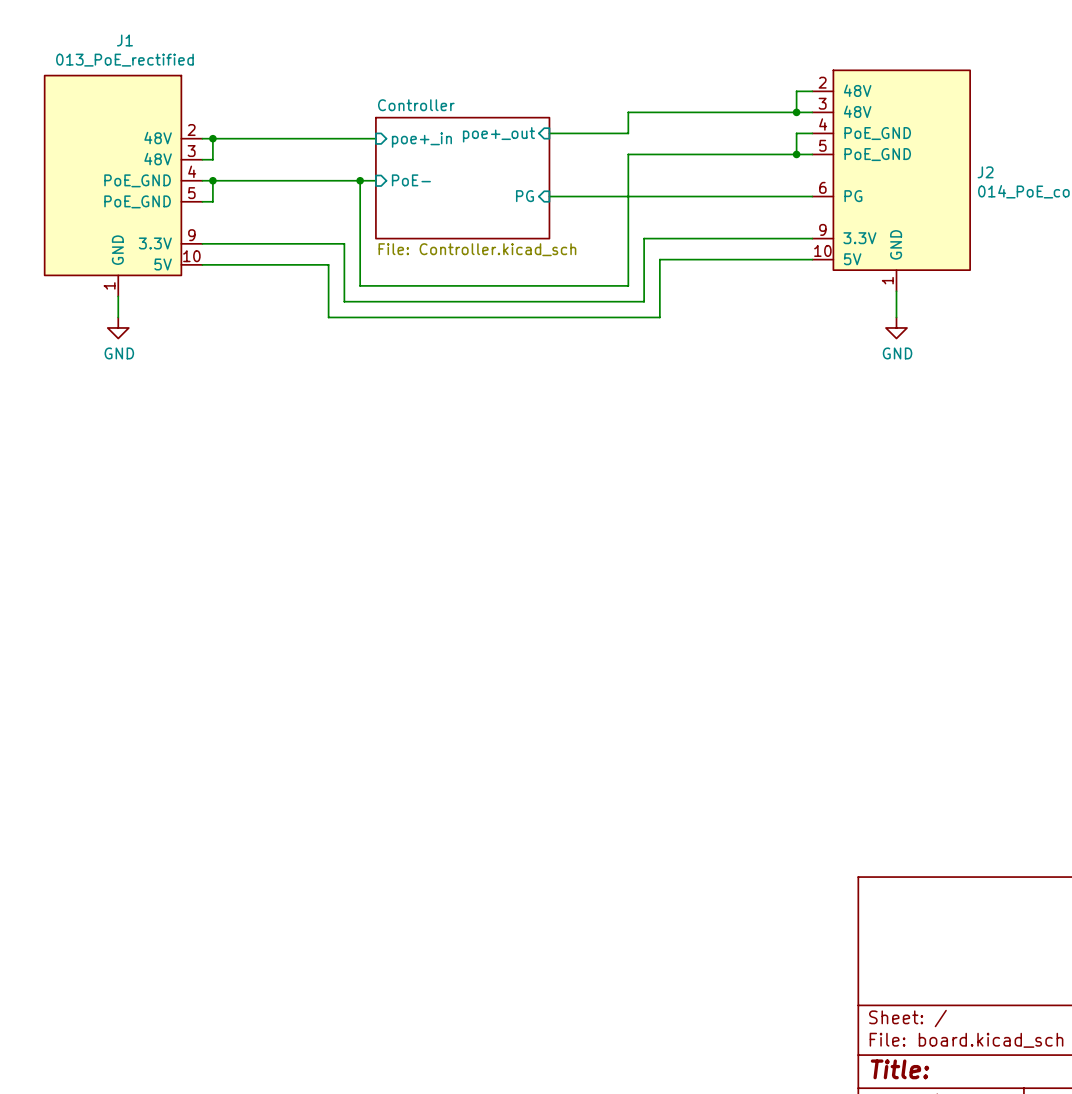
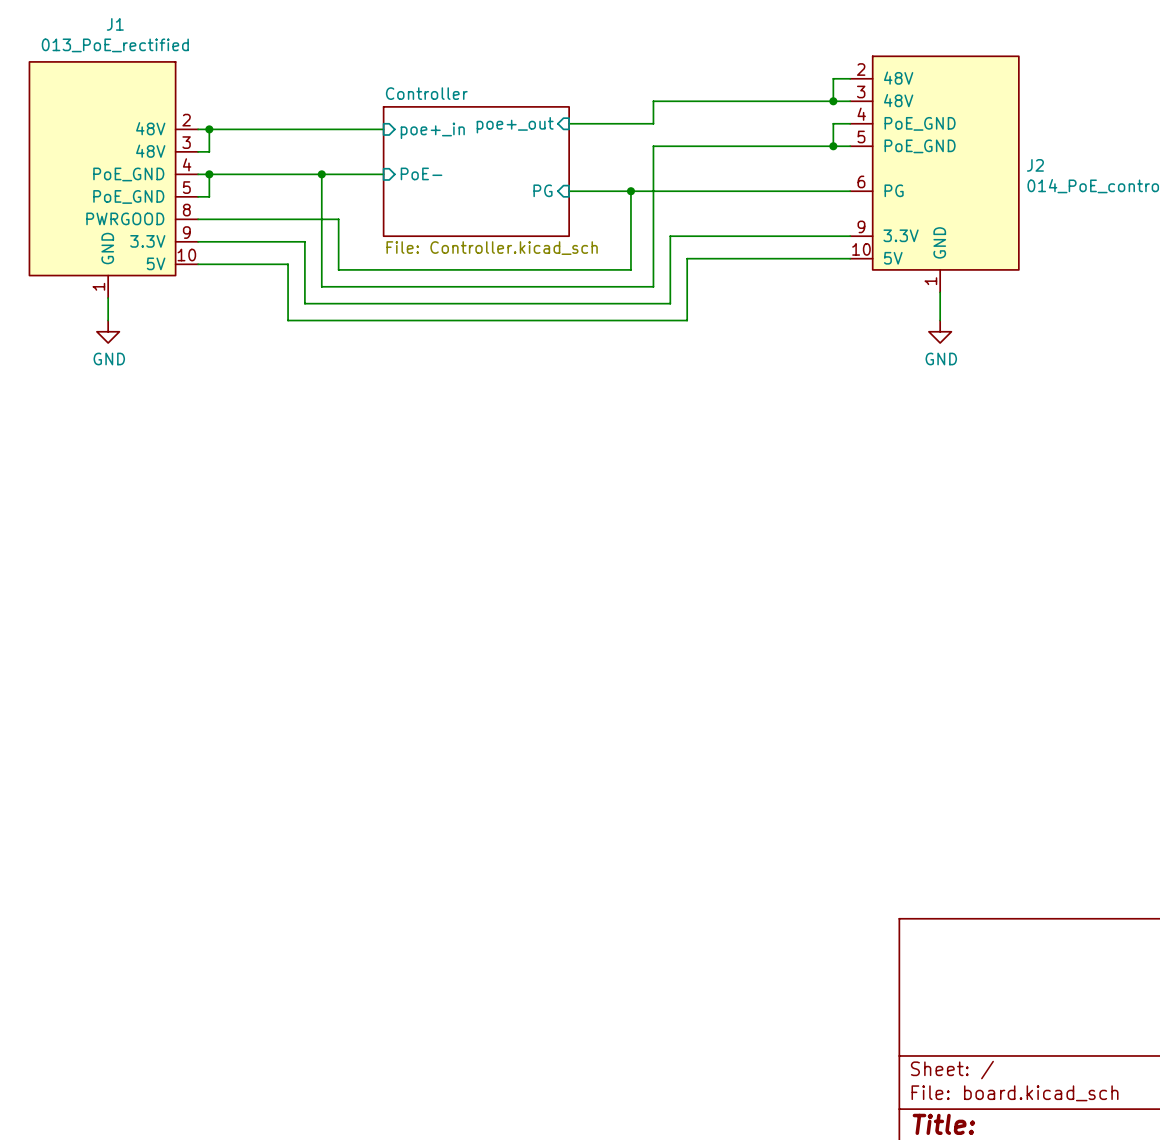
J1 symbol: [44, 75, 203, 297] -> [29, 61, 199, 299]
wire: (360, 180) (360, 285) -> (321, 174) (321, 286) (366, 286)
junction position: (360, 180) -> (321, 174)
wire: none -> (630, 191) (630, 269) (338, 269) (338, 219) (198, 219)
junction: none -> (630, 191)
wire: (302, 243) (344, 243) (344, 301) -> (304, 241) (304, 303) (349, 303)
wire: (286, 264) (328, 264) (328, 317) -> (288, 264) (288, 320) (333, 320)

